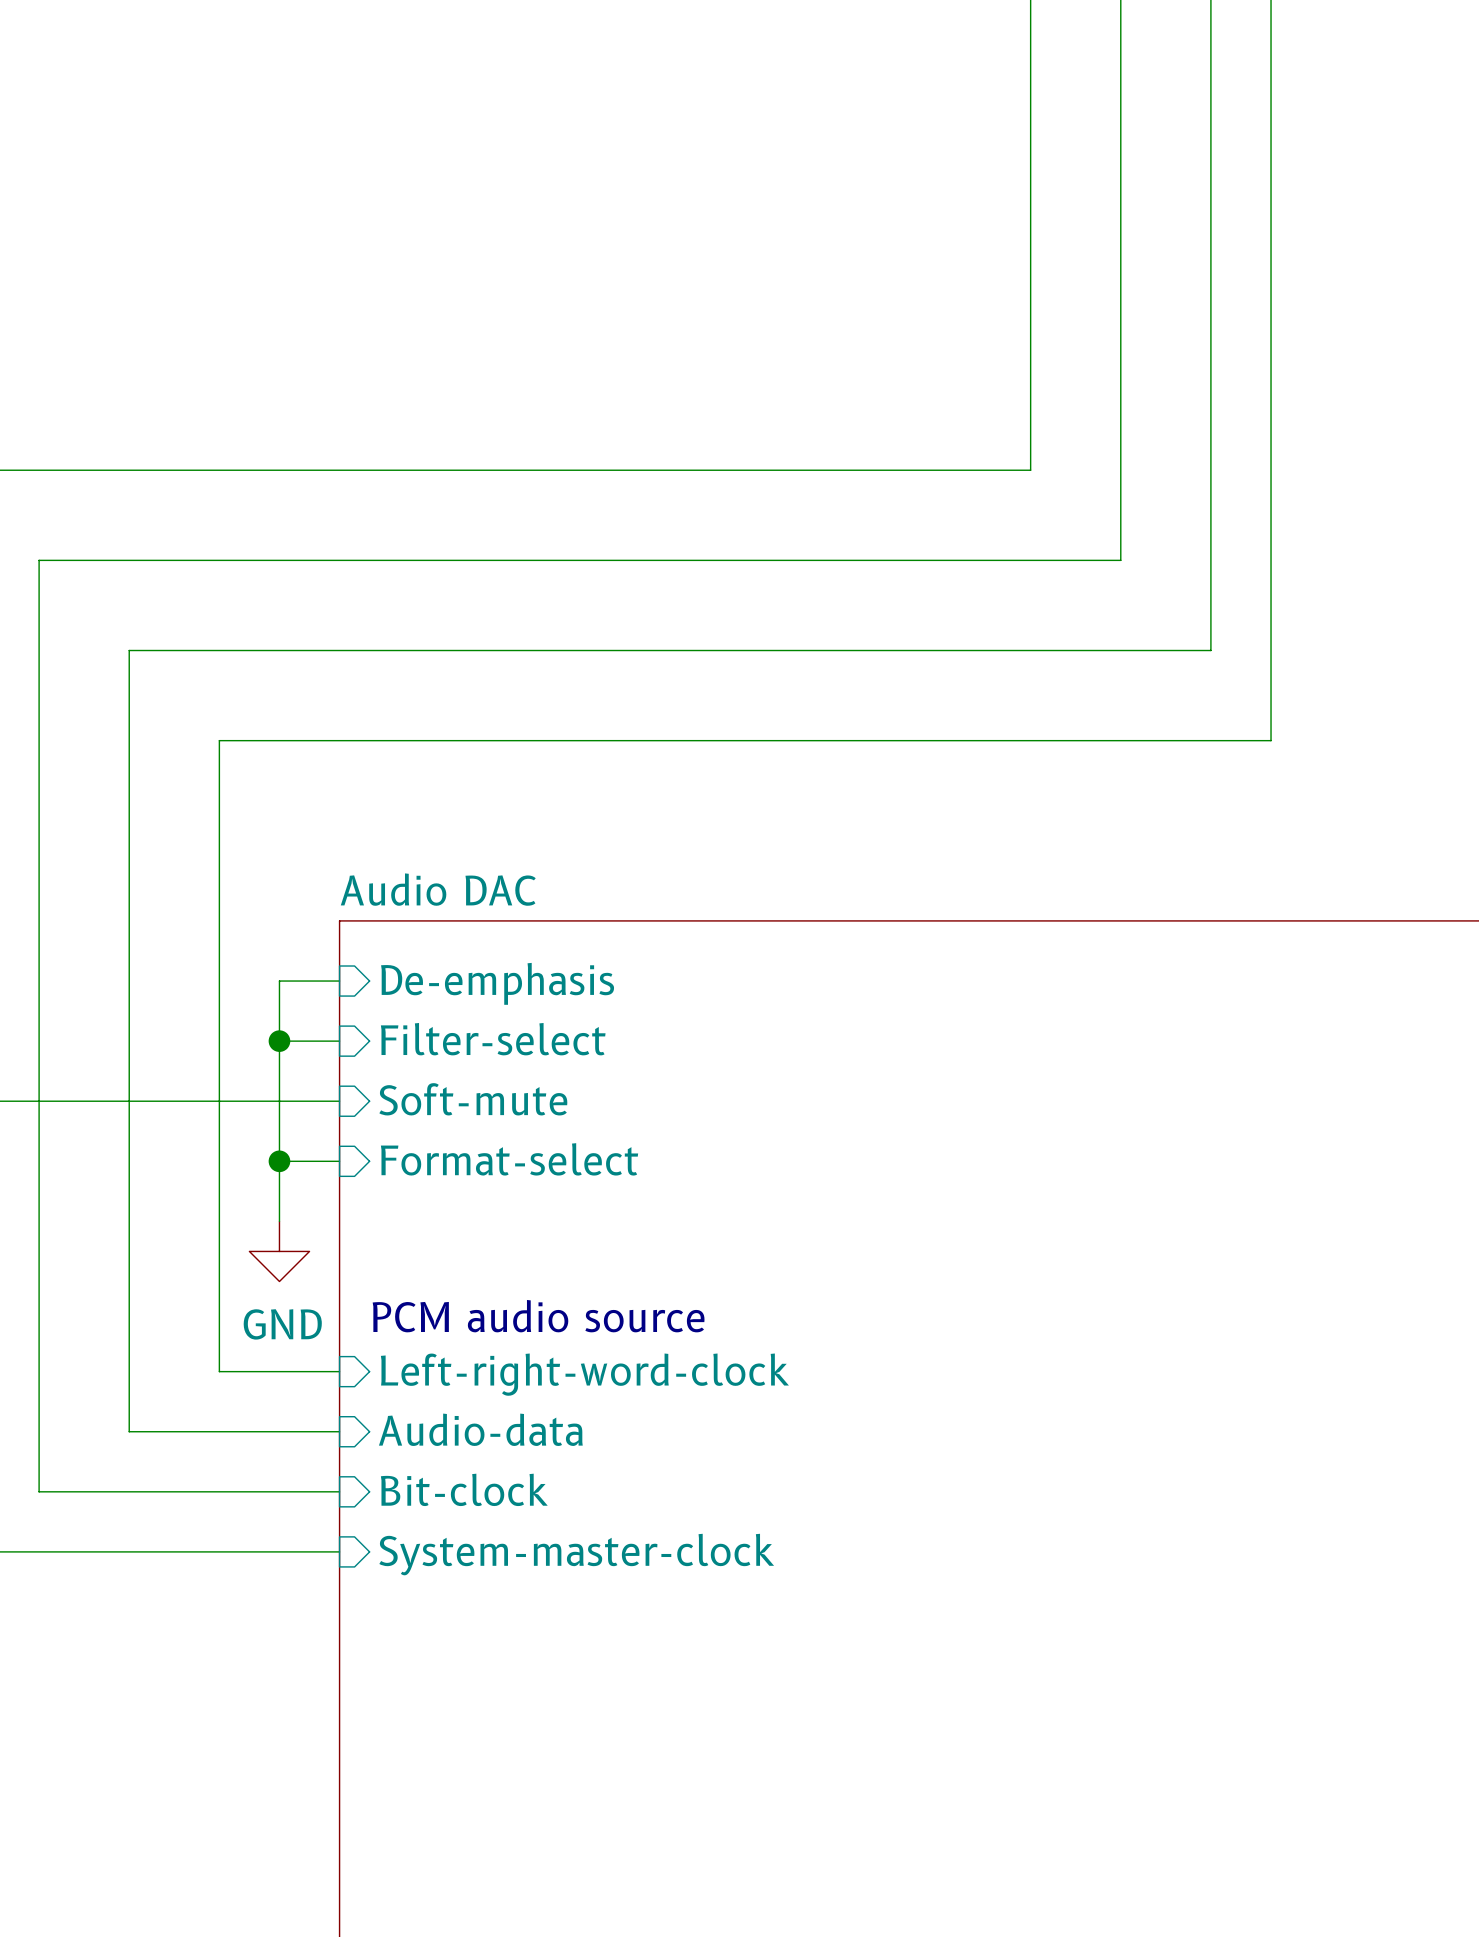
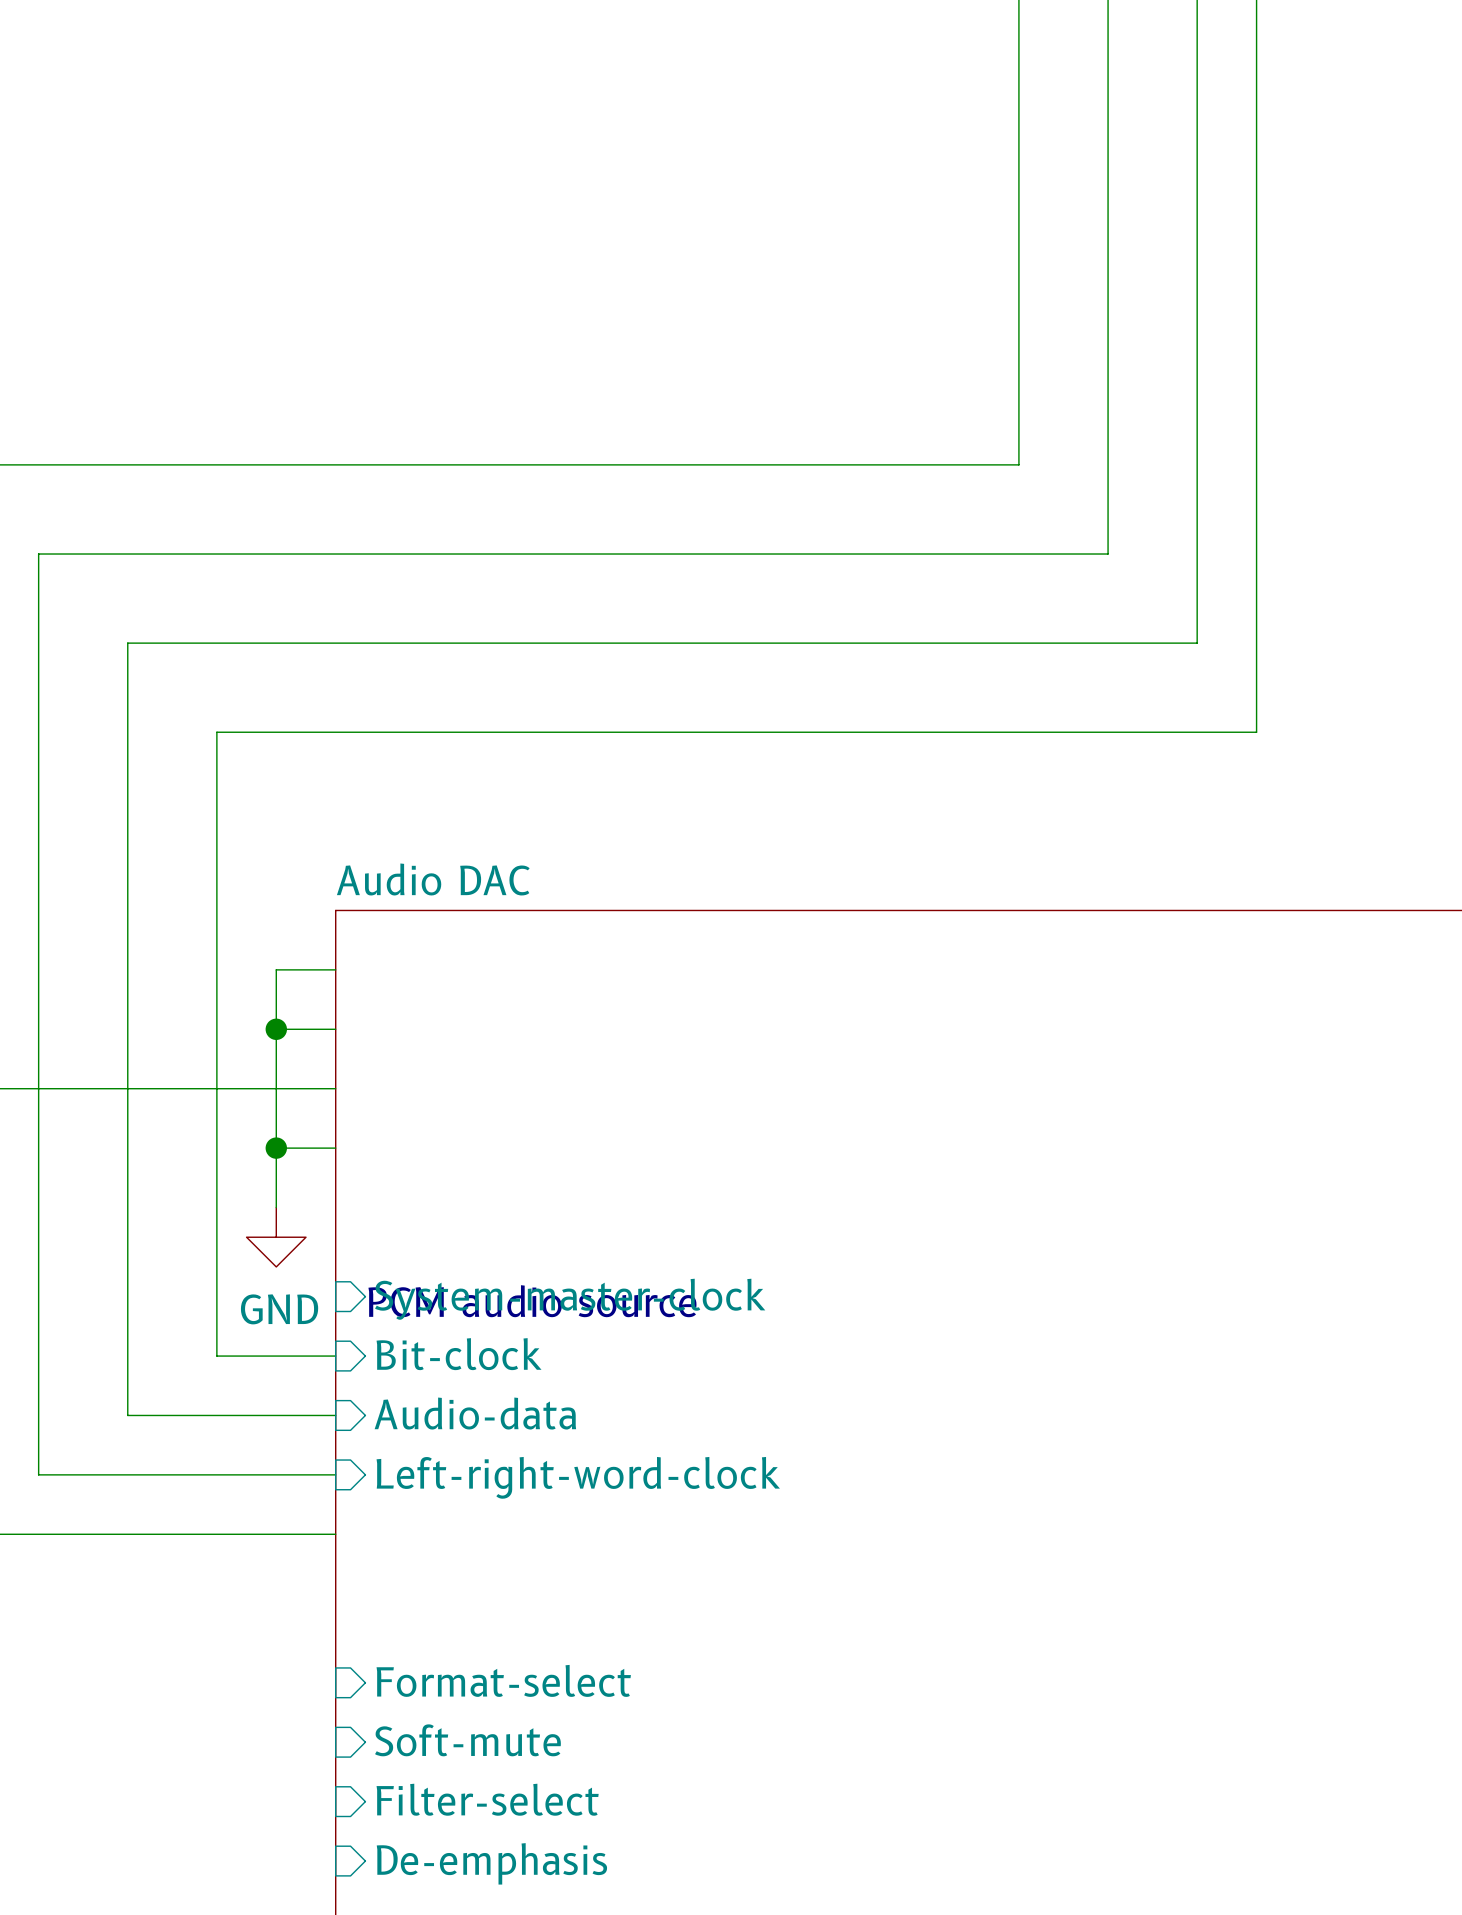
sheet pin: De-emphasis (497, 983) -> none
sheet pin: Filter-select (493, 1039) -> none
sheet pin: Soft-mute (473, 1099) -> none
sheet pin position: Format-select (509, 1159) -> Format-select (503, 1680)
sheet pin: Left-right-word-clock (584, 1374) -> Bit-clock (459, 1354)
sheet pin: Bit-clock (464, 1489) -> Left-right-word-clock (578, 1477)
sheet pin position: System-master-clock (576, 1554) -> System-master-clock (570, 1299)
sheet pin: none -> Soft-mute (467, 1740)
sheet pin: none -> Filter-select (487, 1799)
sheet pin: none -> De-emphasis (491, 1863)

